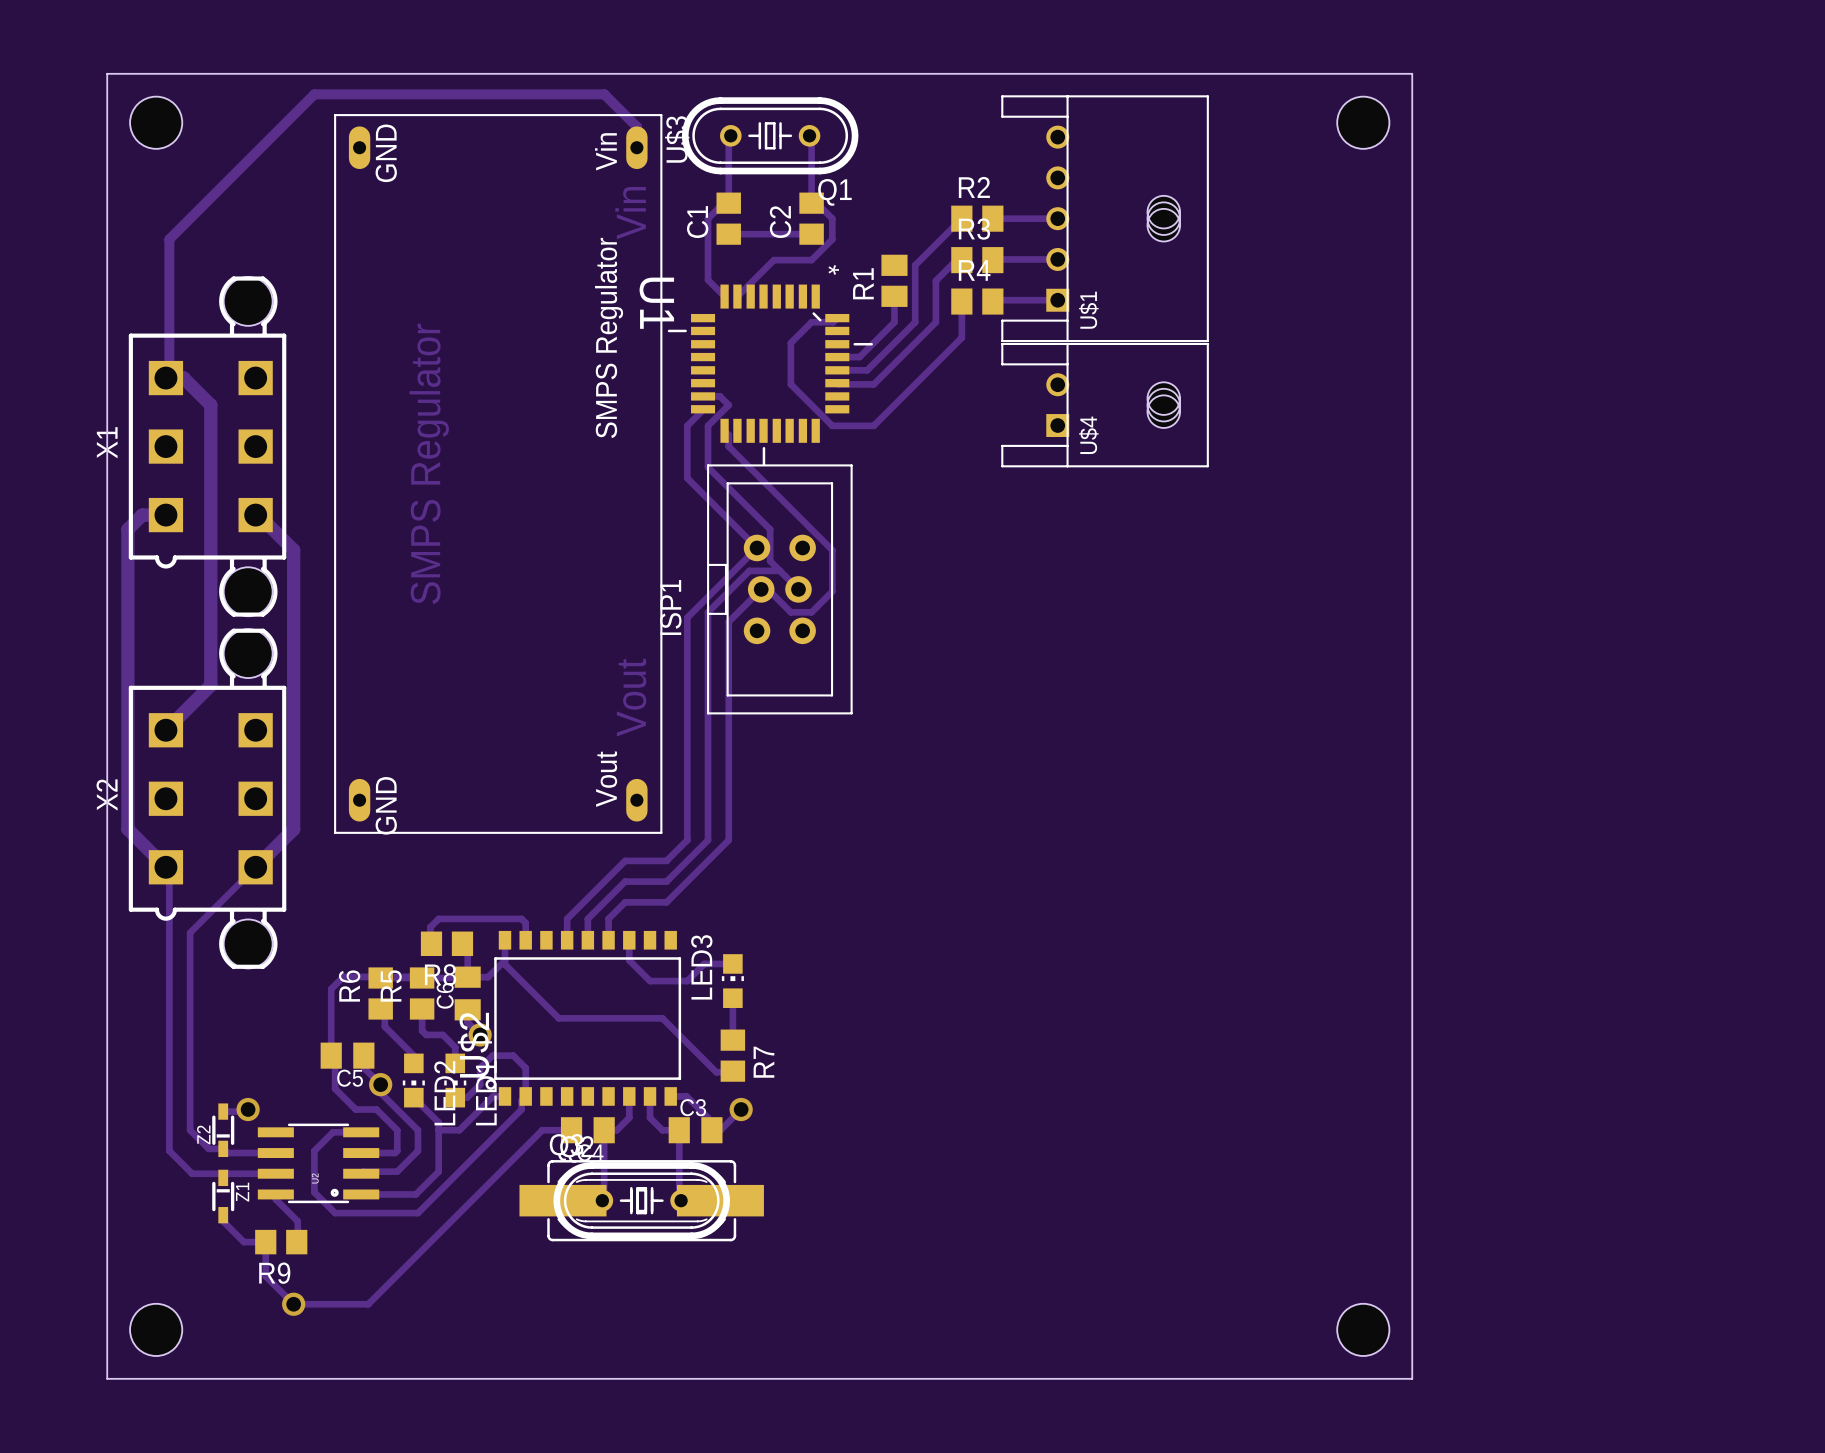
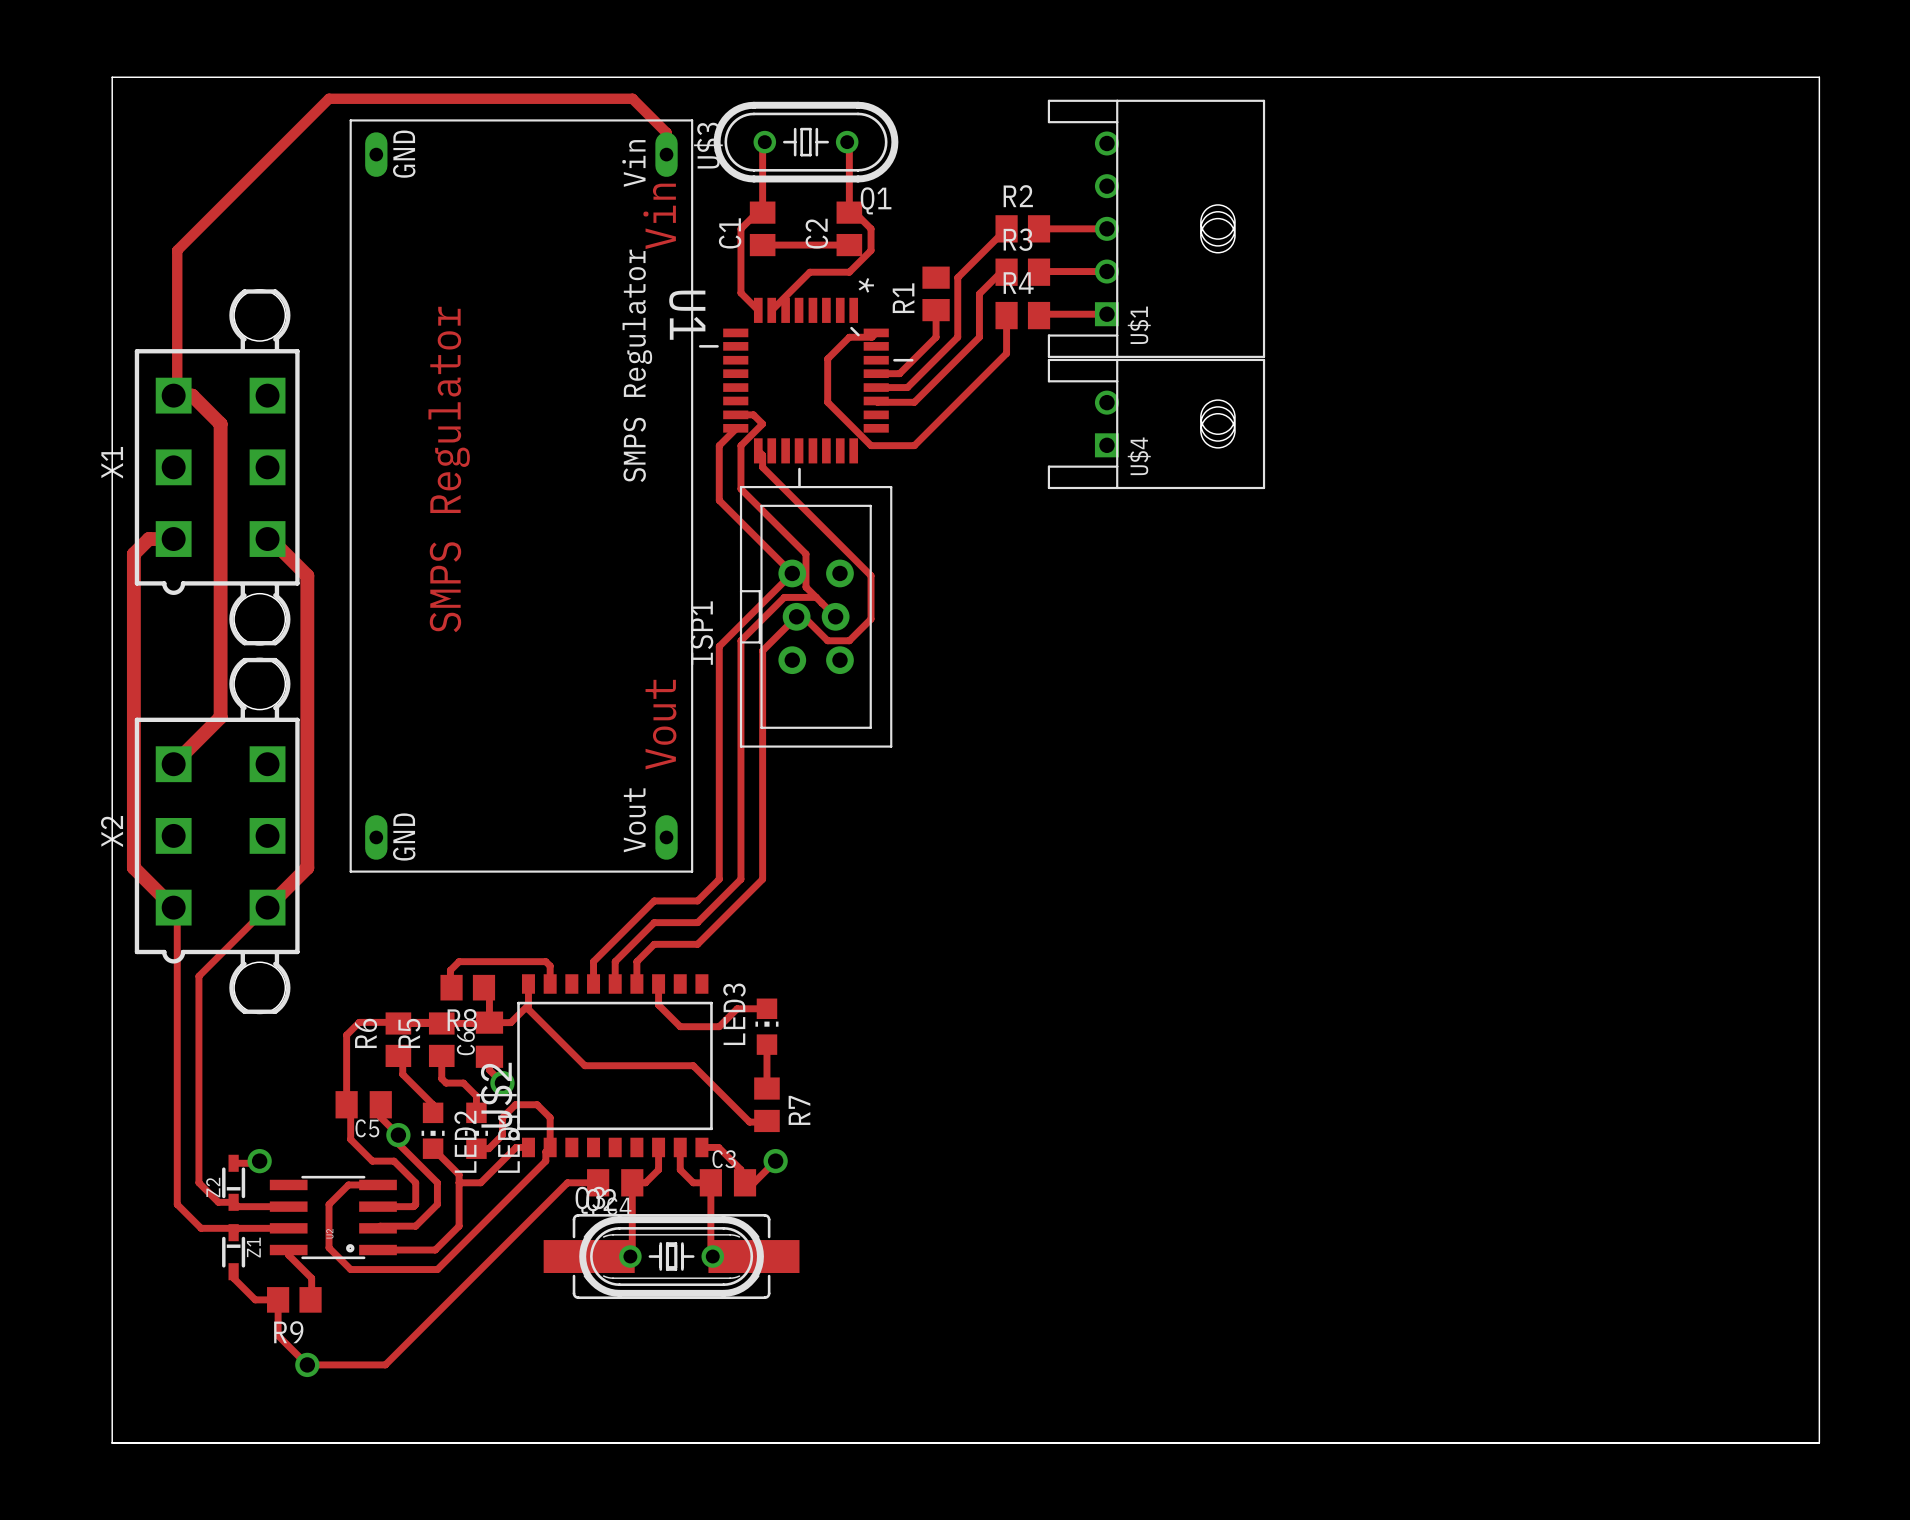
board edge: (1412, 73) (1412, 1378) -> (1477, 77) (1819, 77) (1819, 1442) (1477, 1442)
hole: (156, 122) -> none
hole: (1363, 122) -> none
hole: (156, 1329) -> none
hole: (1363, 1329) -> none
board edge: none -> (112, 1443) (1819, 1443)

